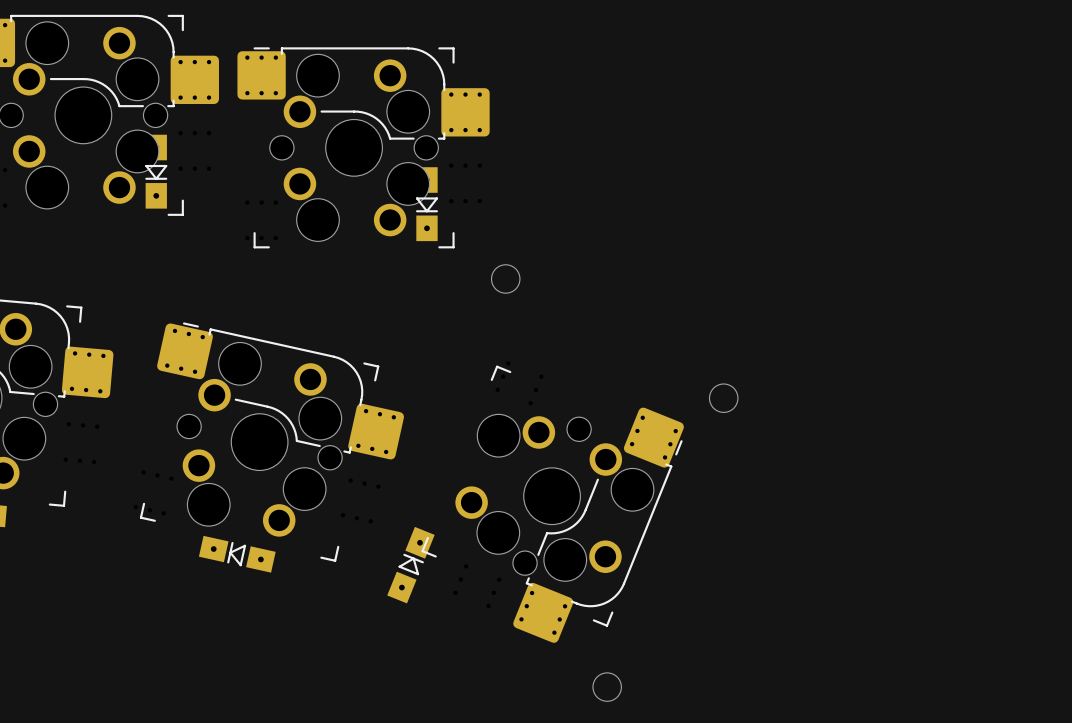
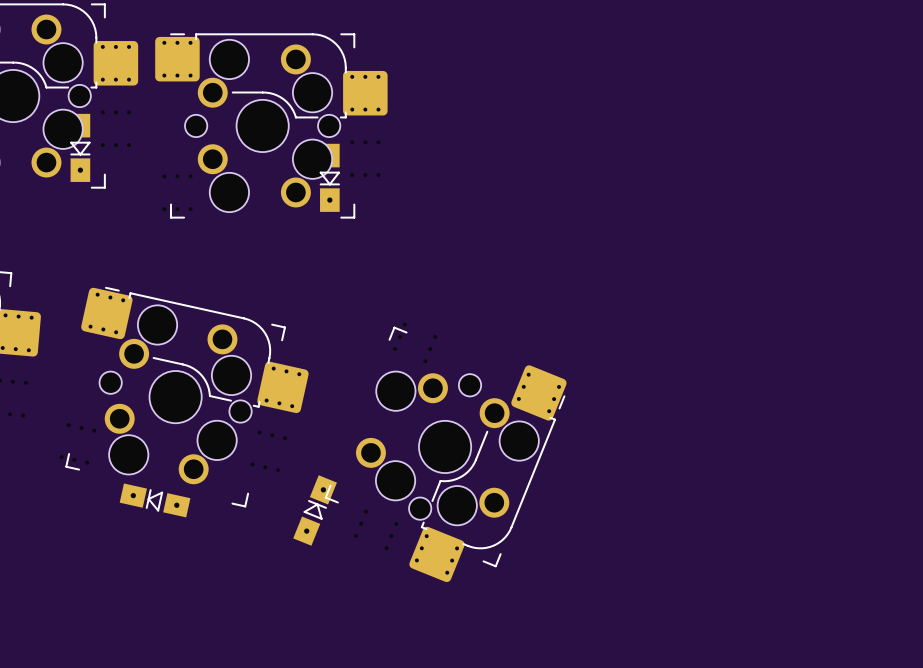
round board edge: [491, 264, 521, 294] -> none
round board edge: [709, 383, 739, 413] -> none
round board edge: [592, 672, 622, 702] -> none

